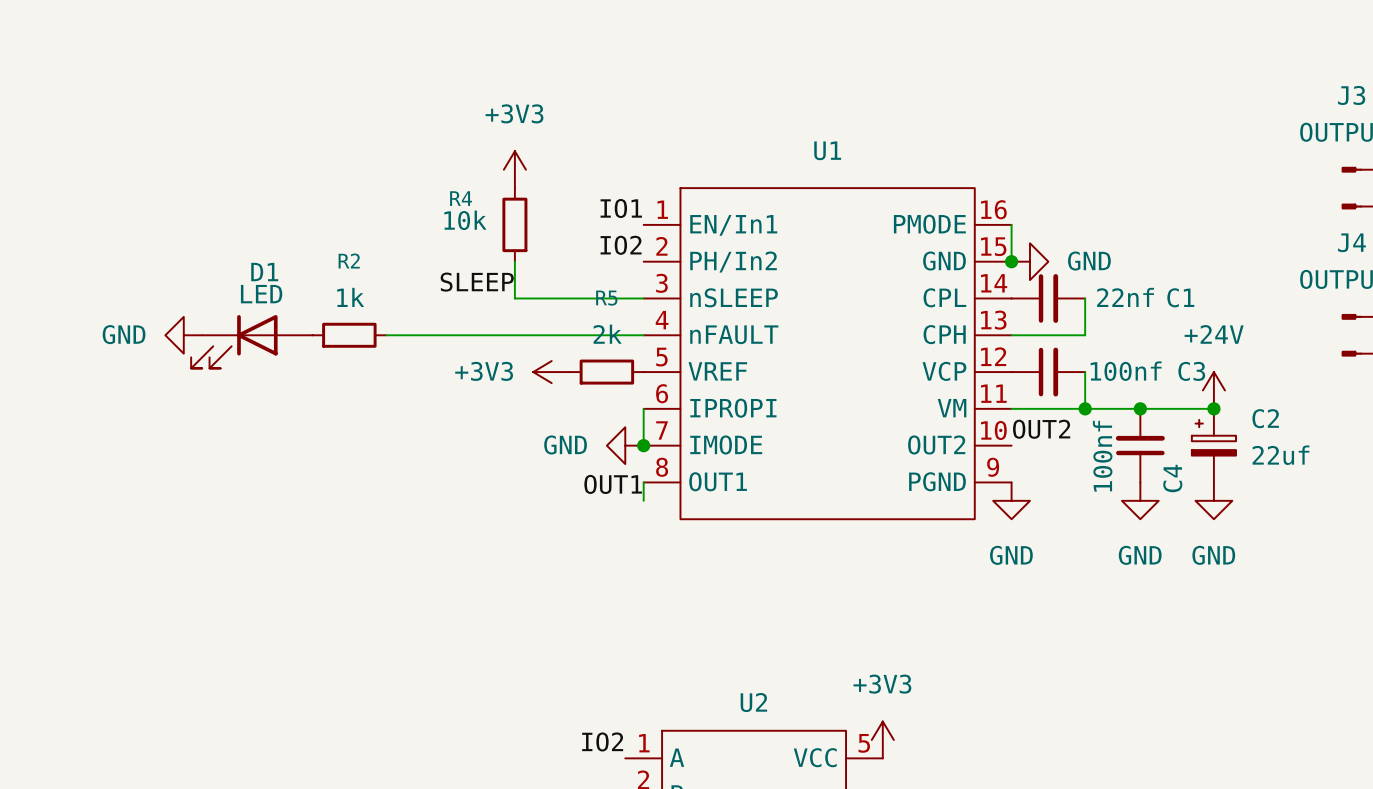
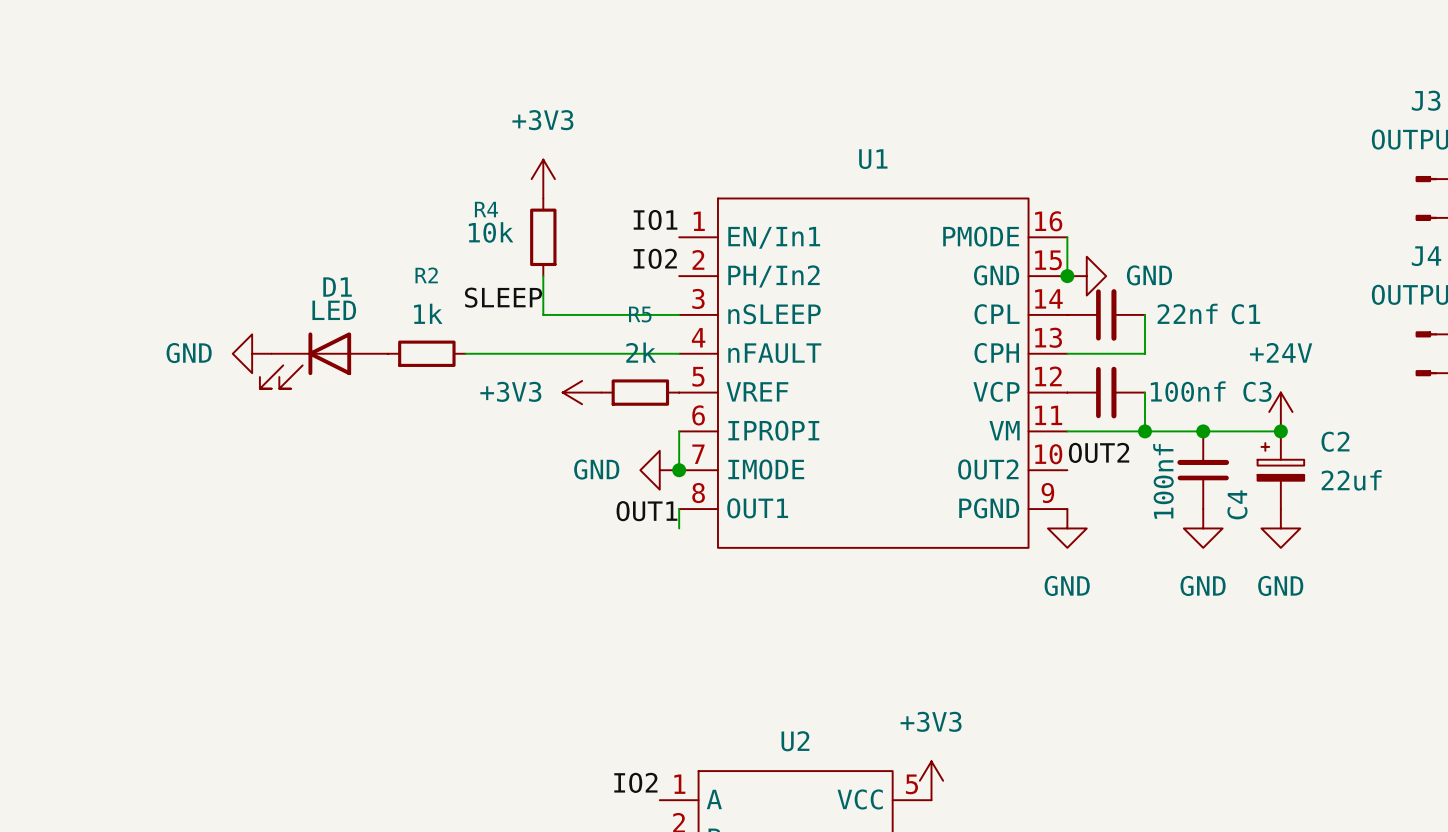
power symbol position: GND (183, 335) -> GND (252, 353)
R2 position: (349, 335) -> (426, 353)
wire: (386, 335) (441, 335) -> none
D1 position: (251, 341) -> (323, 360)

